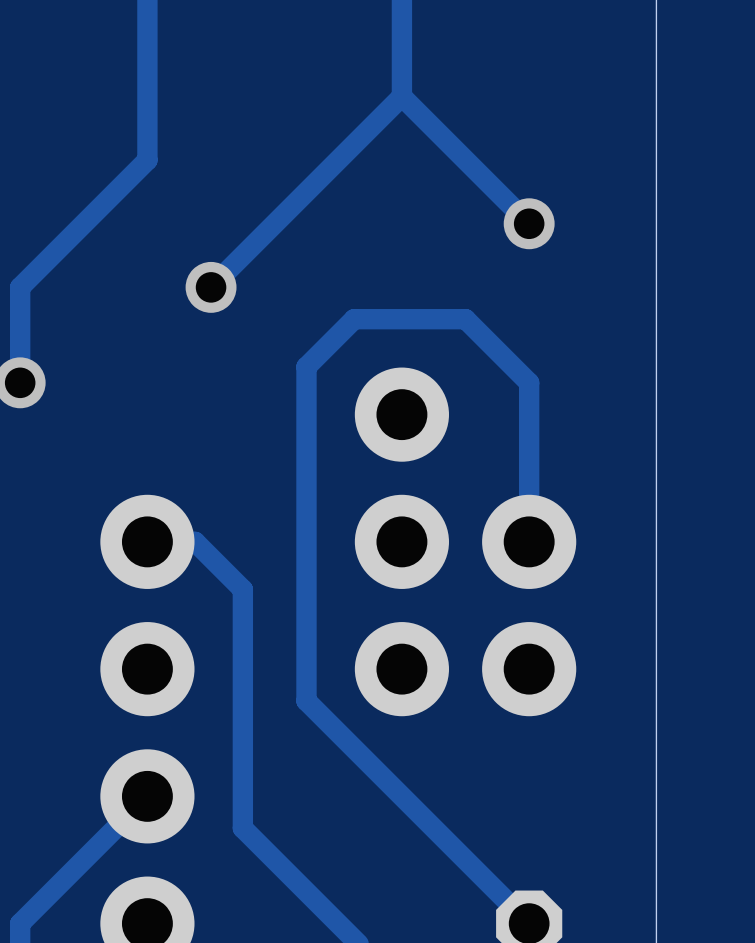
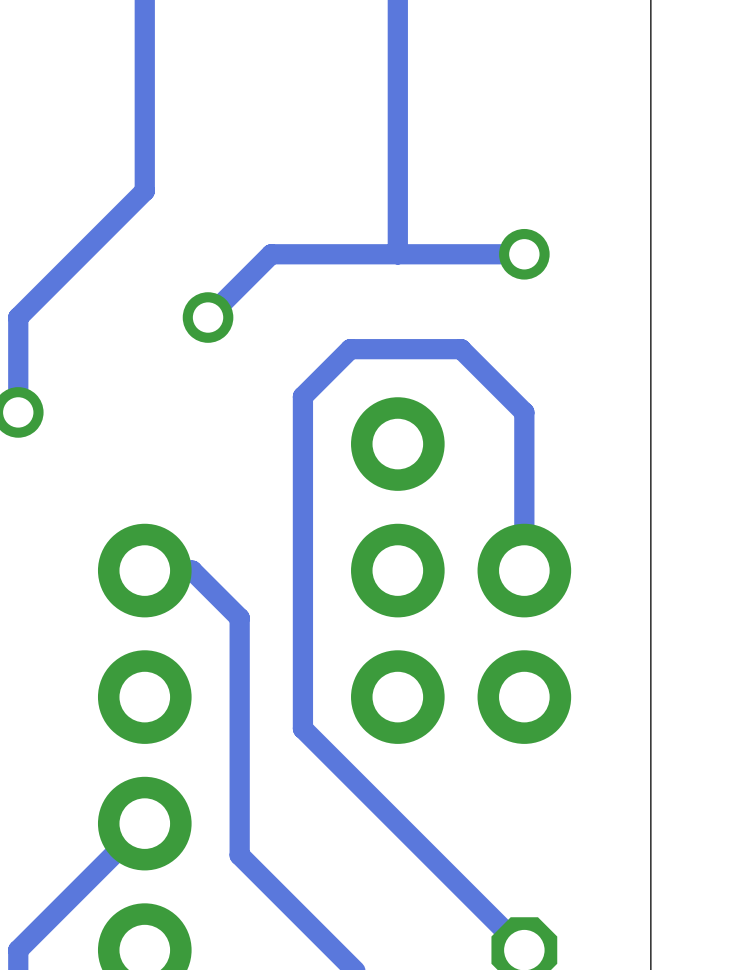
track: none -> (397, 127) (397, 254)
track: (529, 223) (401, 96) (274, 223) -> (524, 254) (271, 254)

